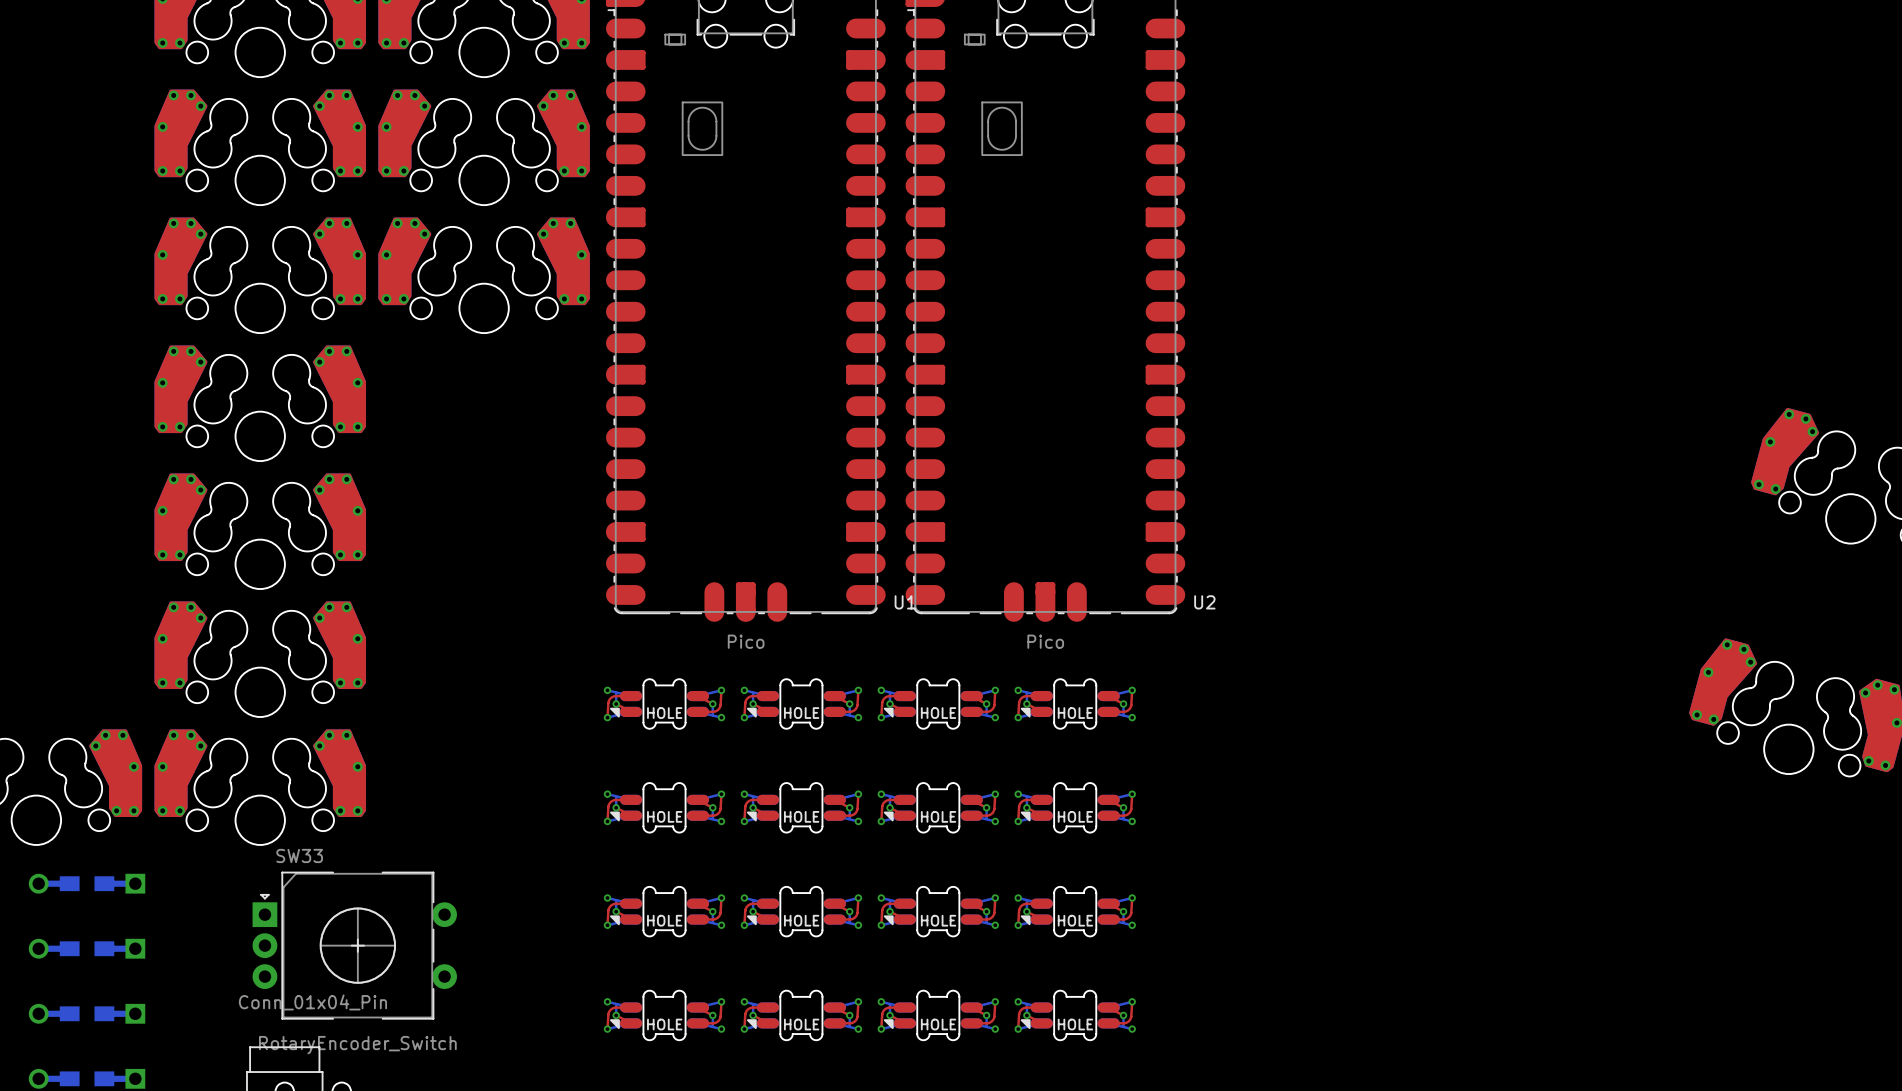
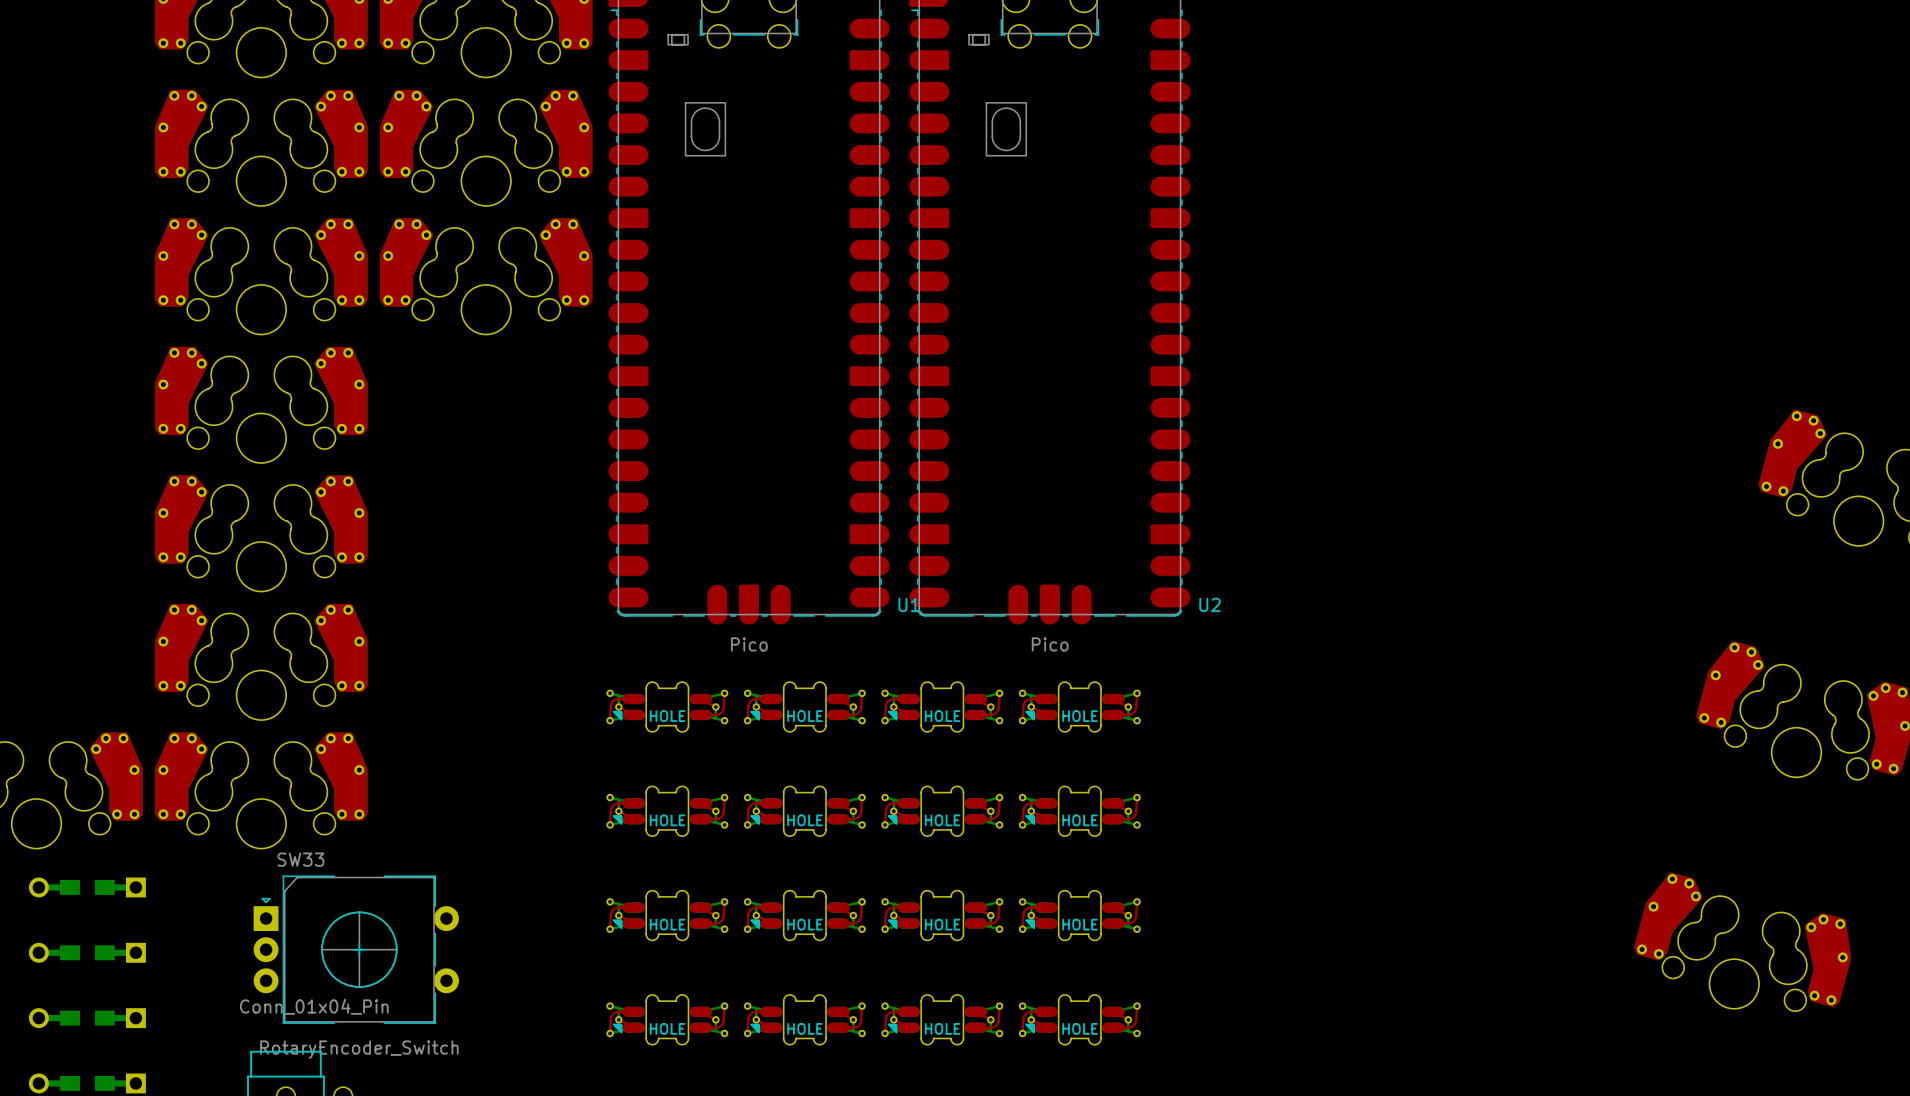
part: none -> (1742, 941)

